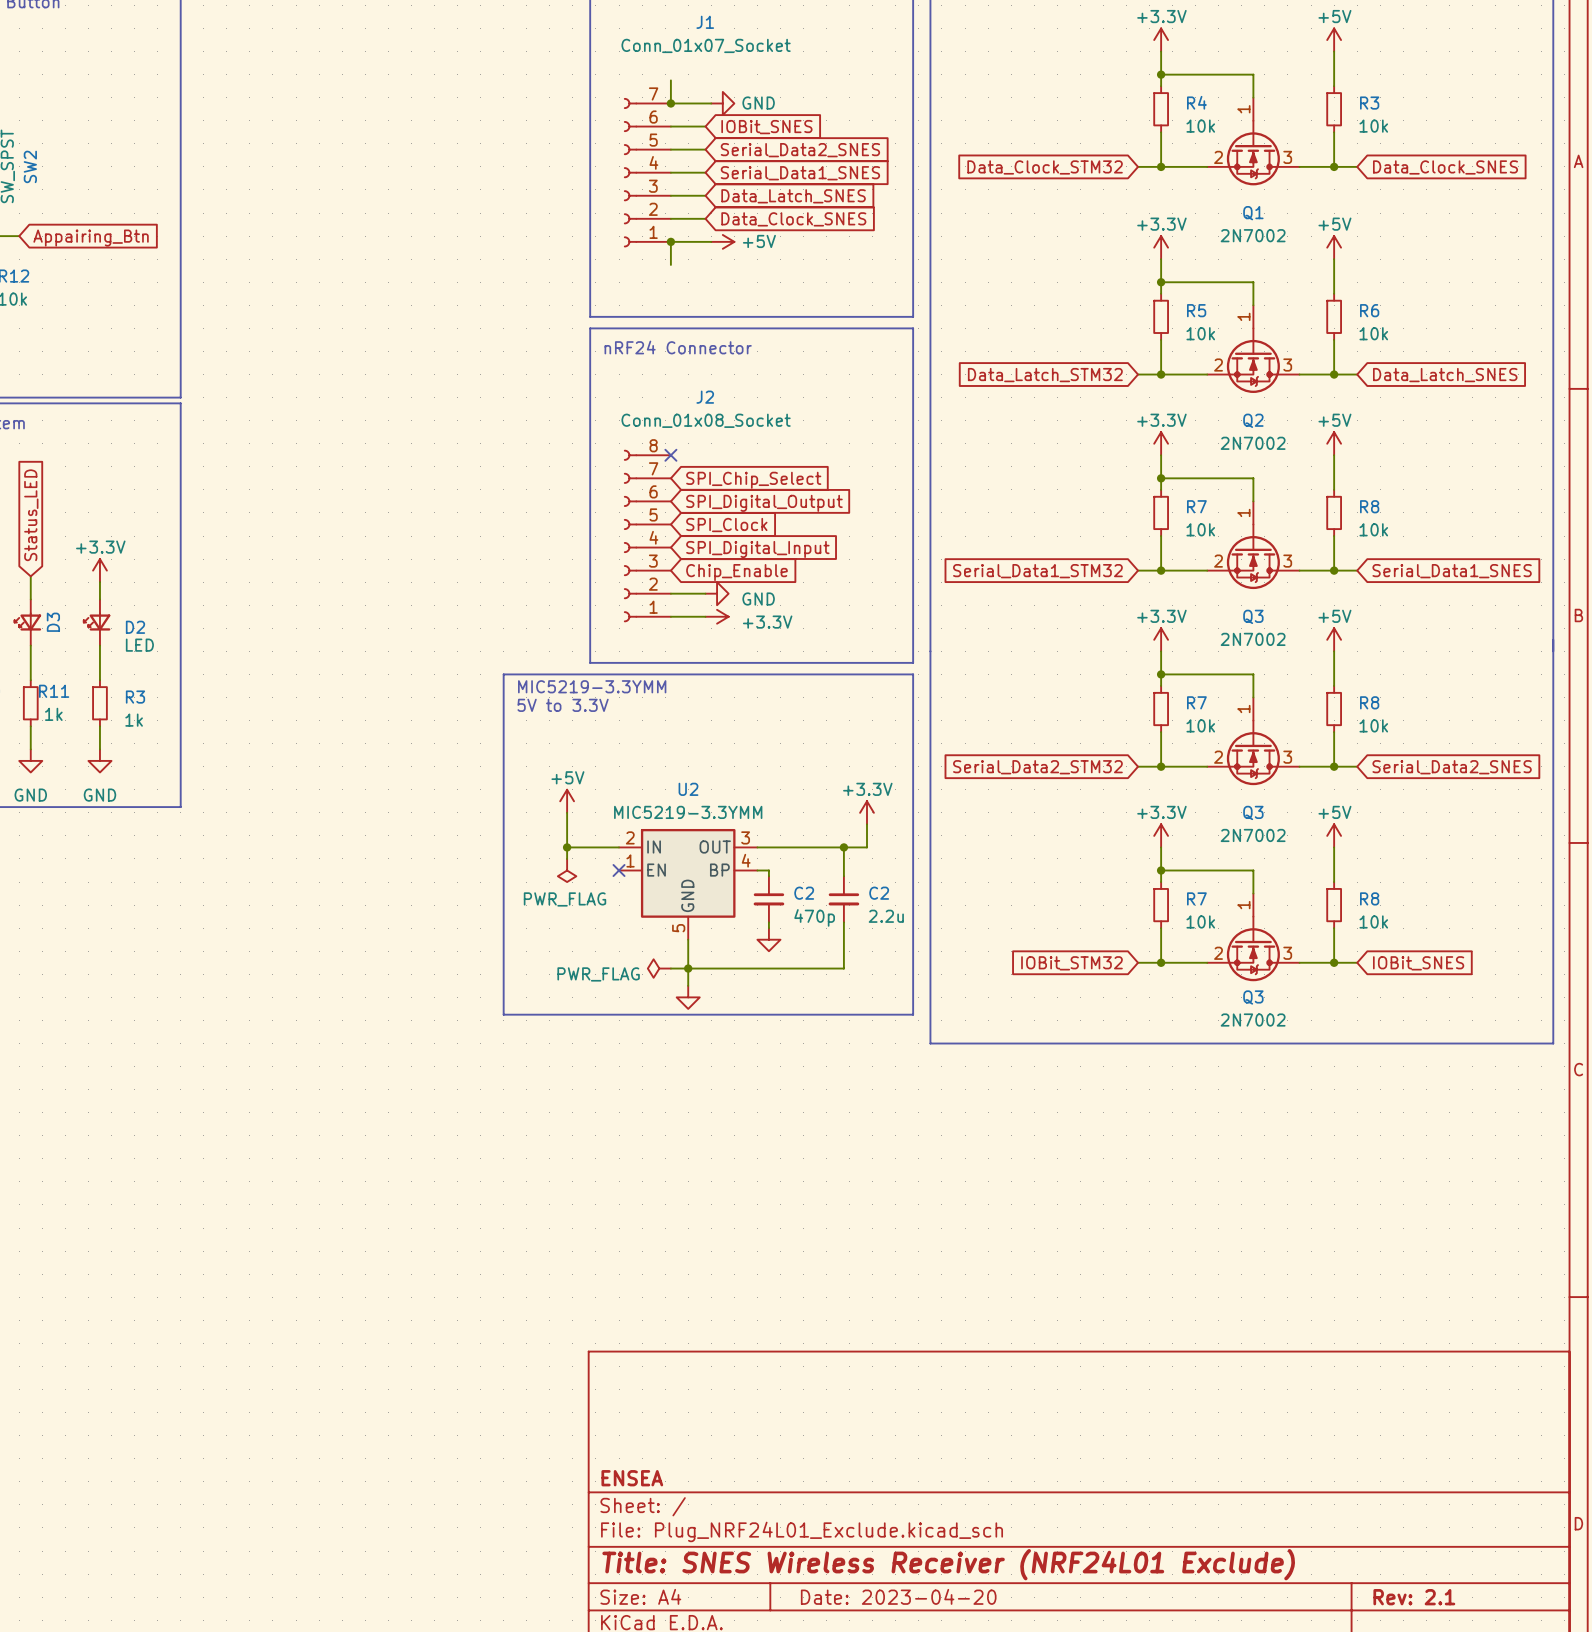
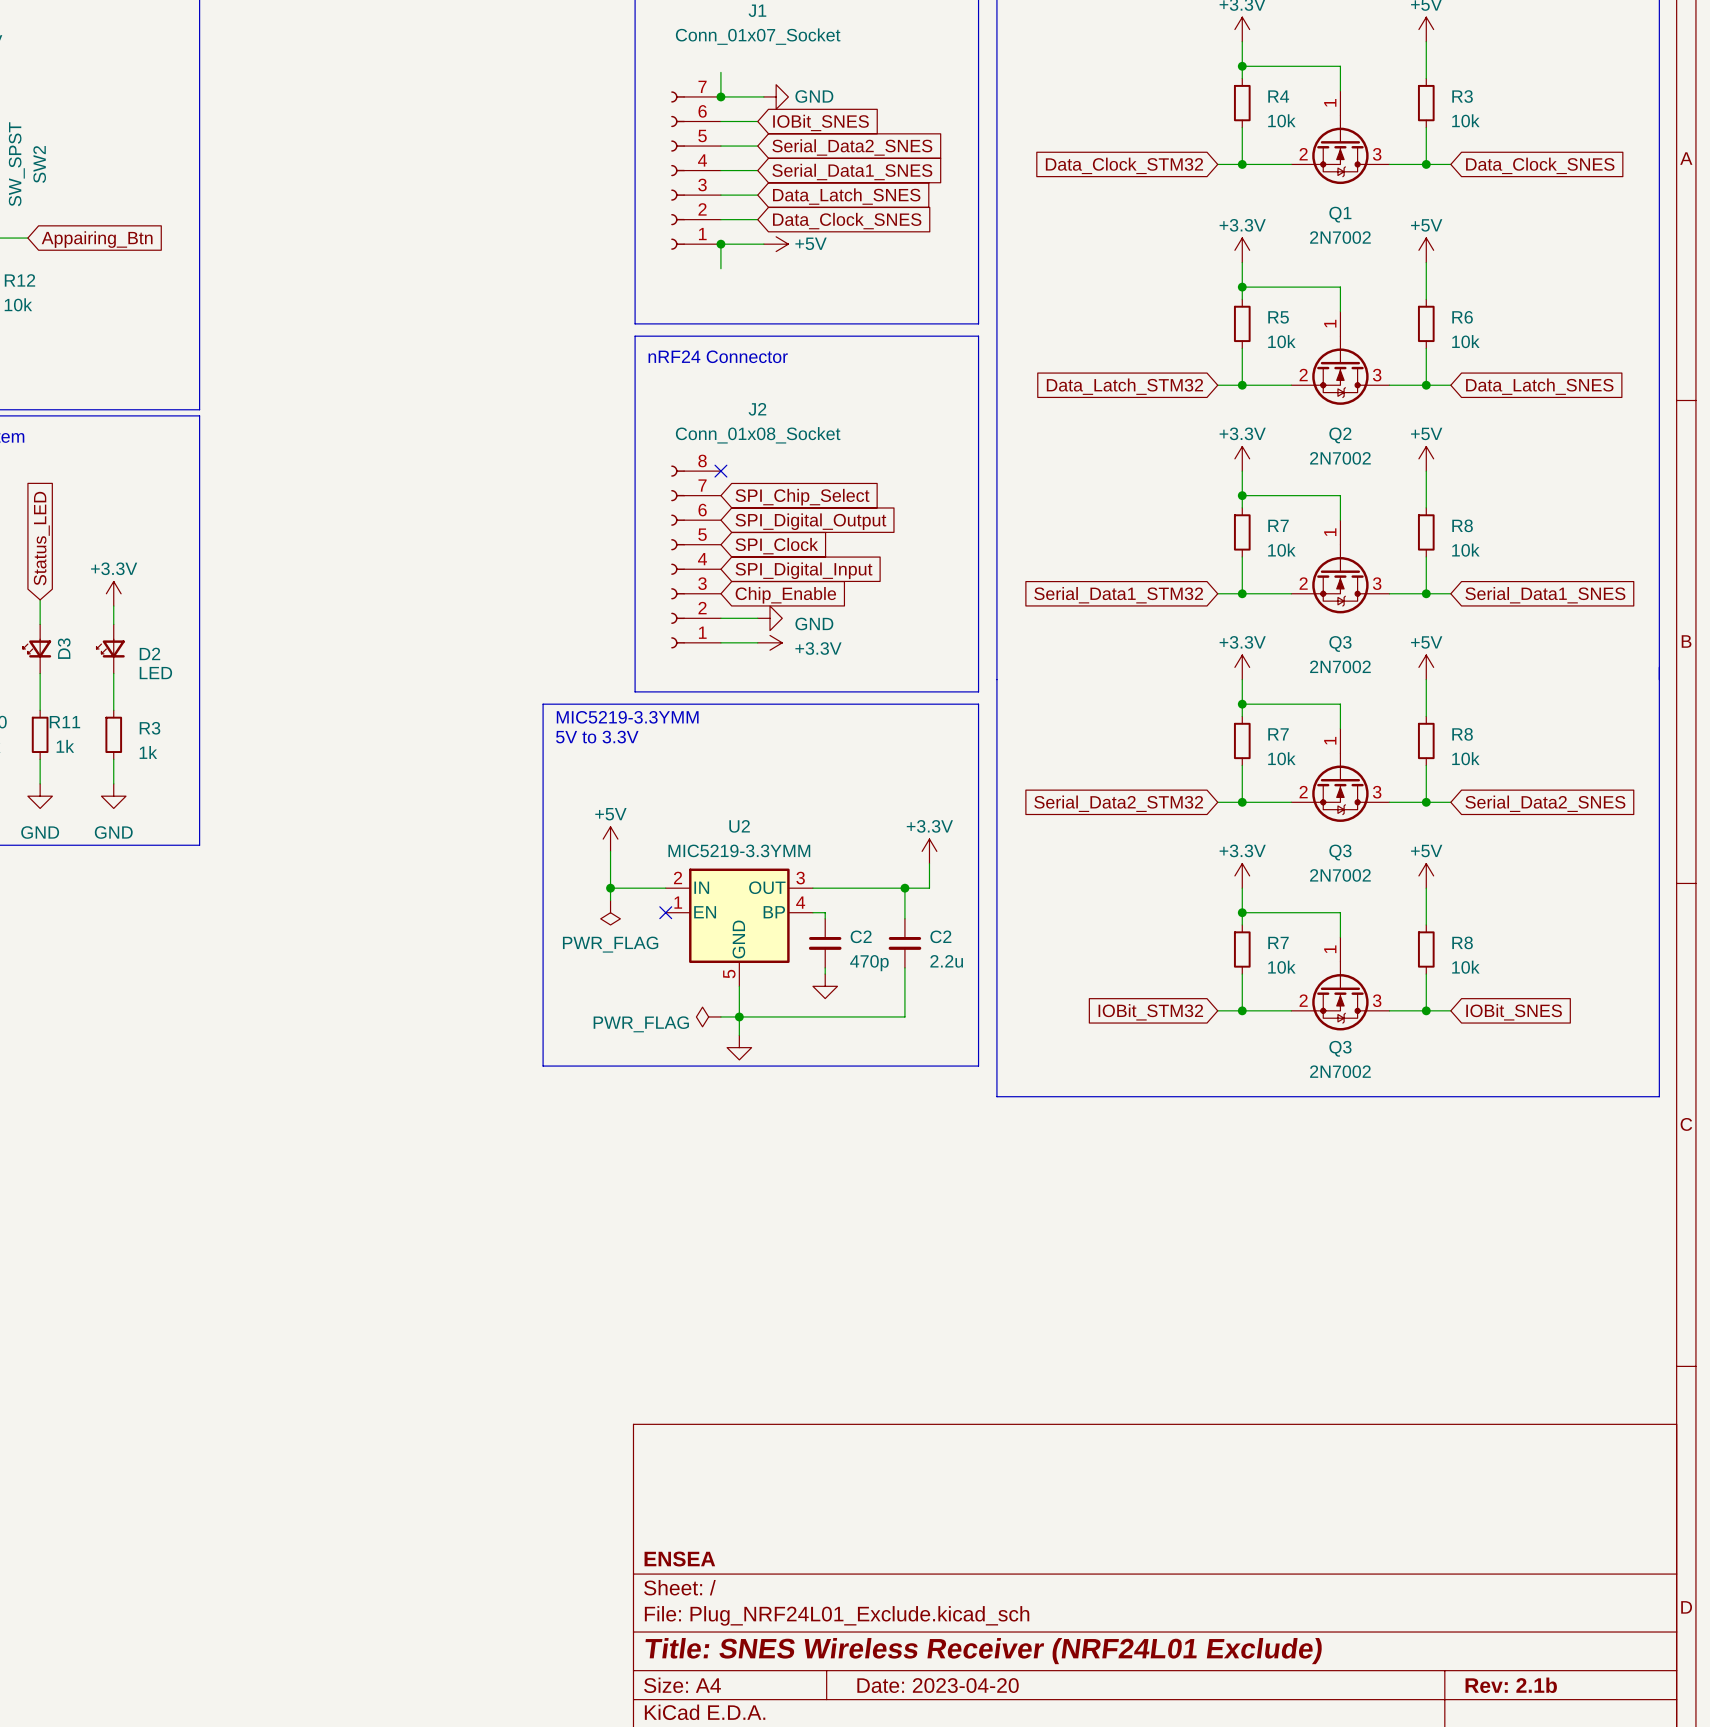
title block: Rev: 2.1 (1414, 1597) -> Rev: 2.1b (1511, 1685)

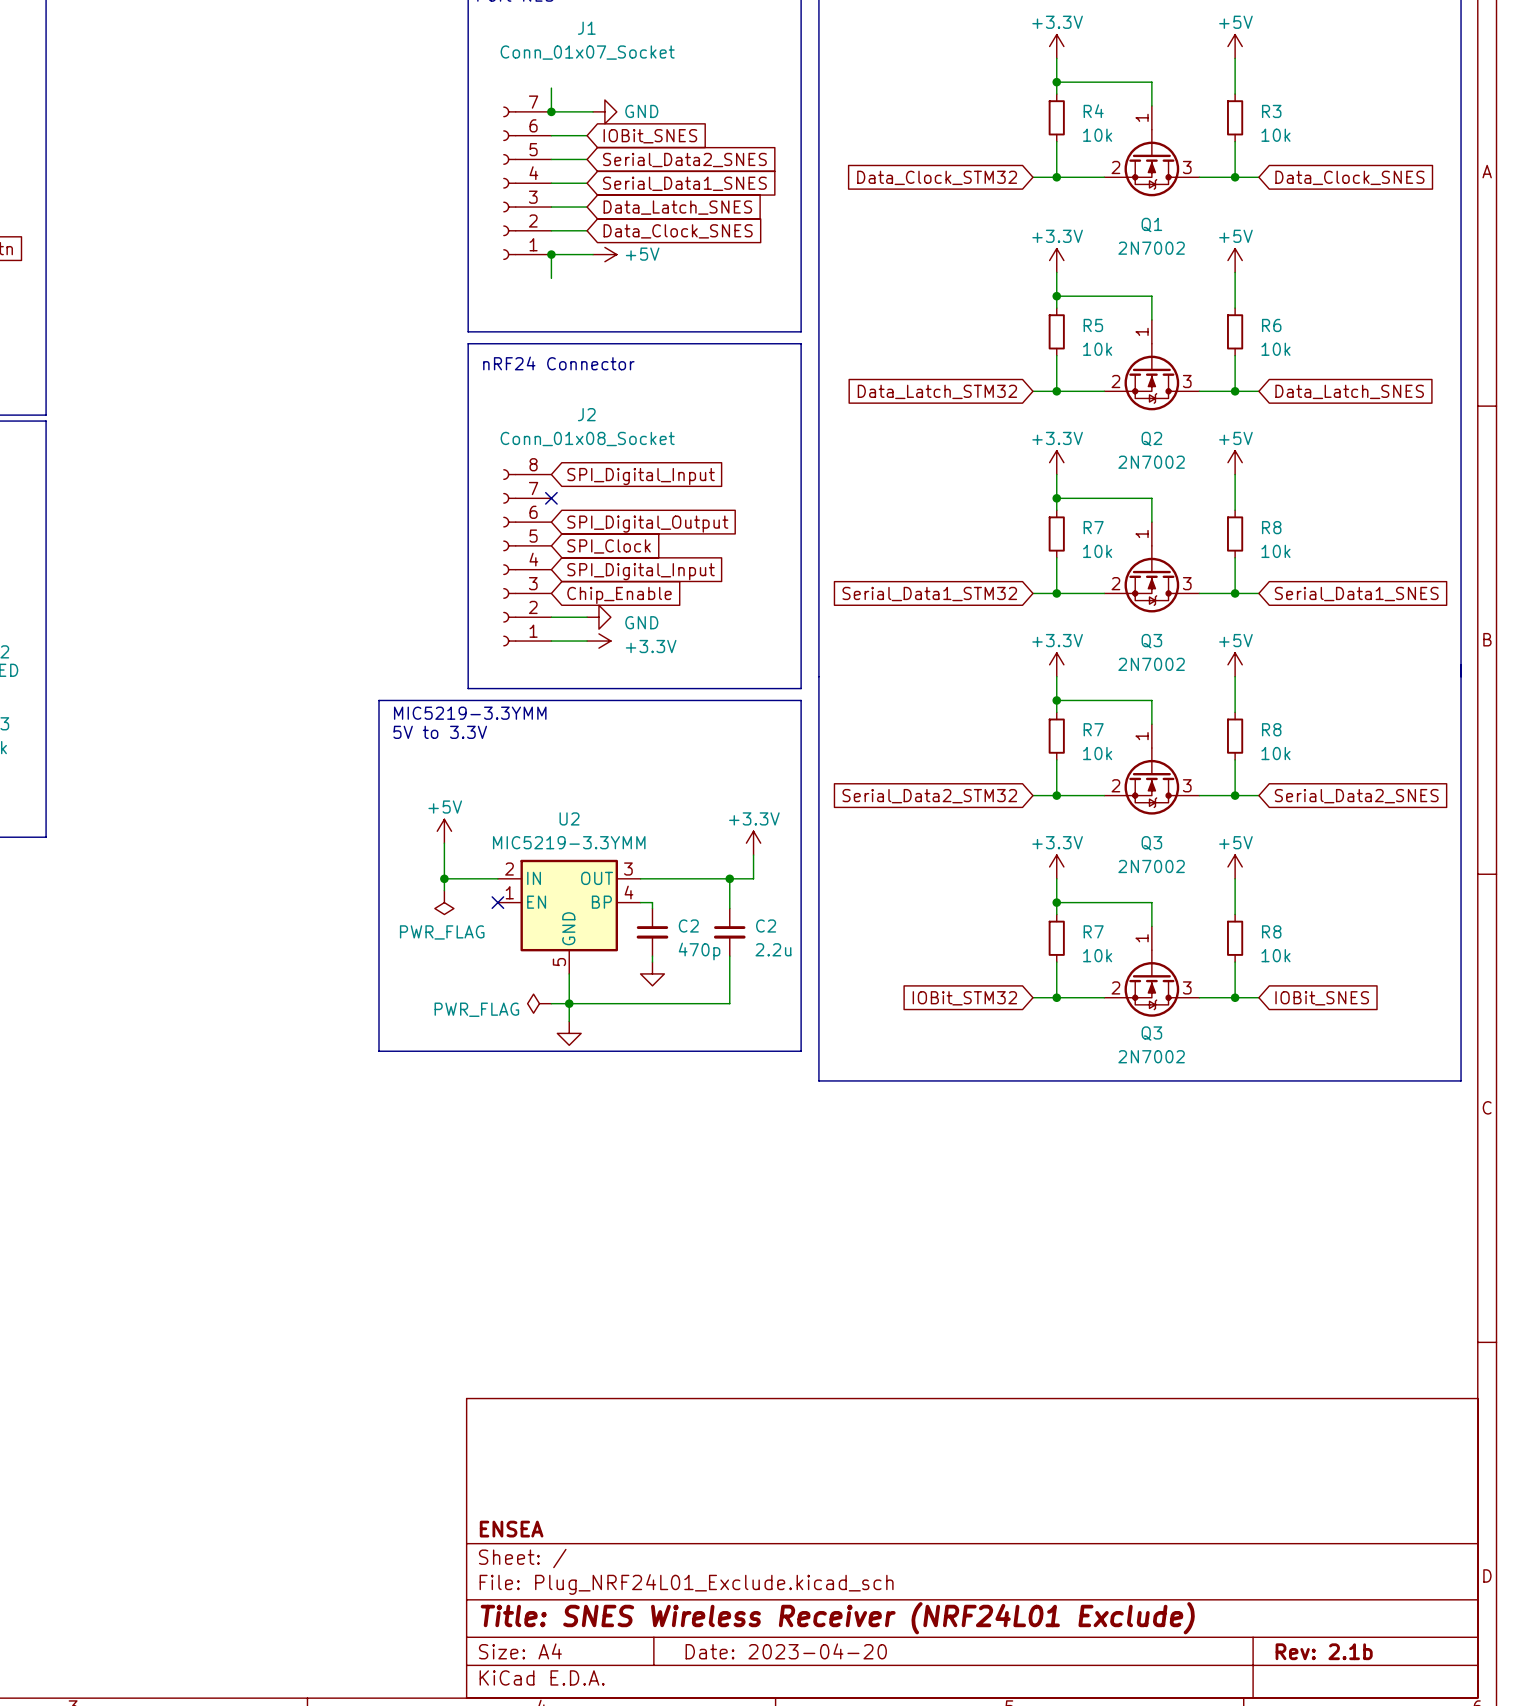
no-connect mark position: (720, 471) -> (551, 498)
global label: none -> SPI_Digital_Input (641, 476)
global label: SPI_Chip_Select (802, 497) -> none

